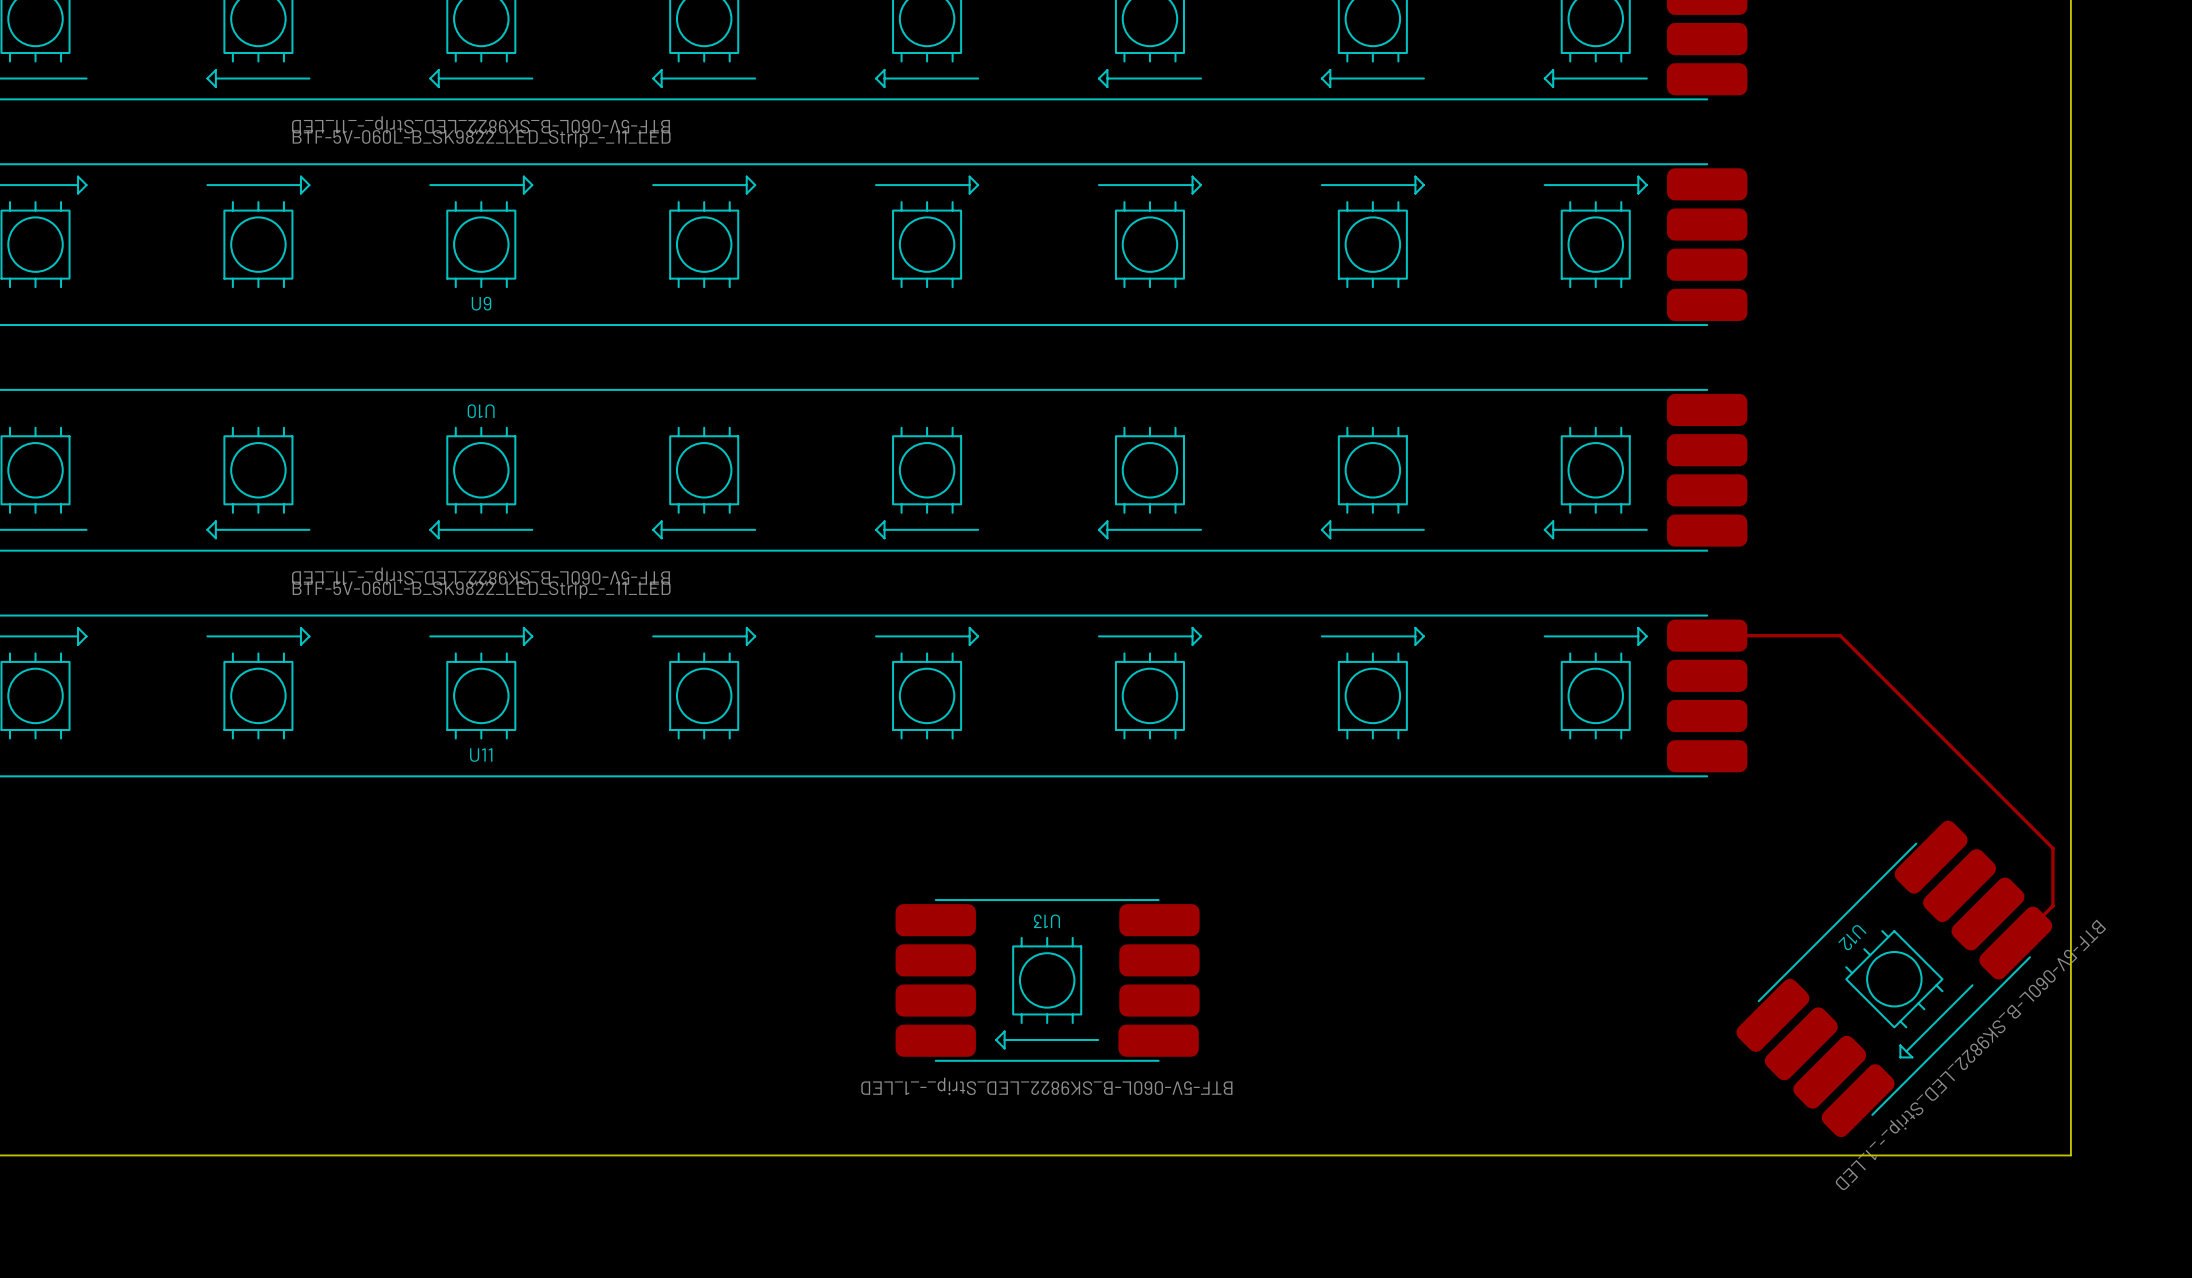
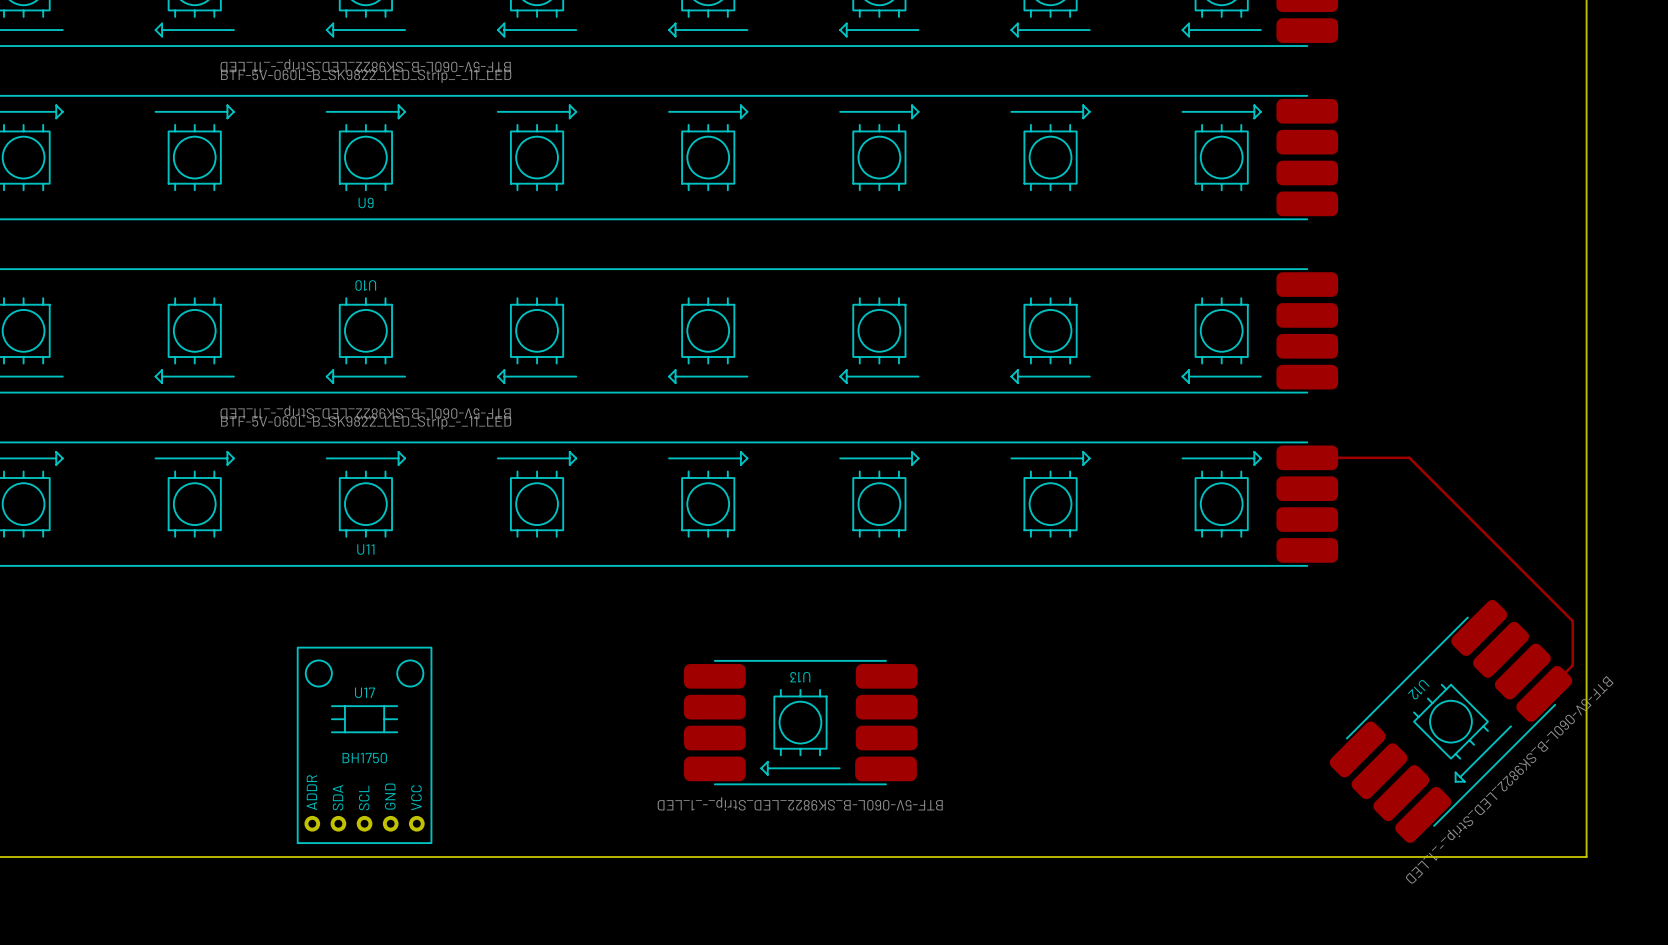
U17: none -> BH1750 (364, 745)

